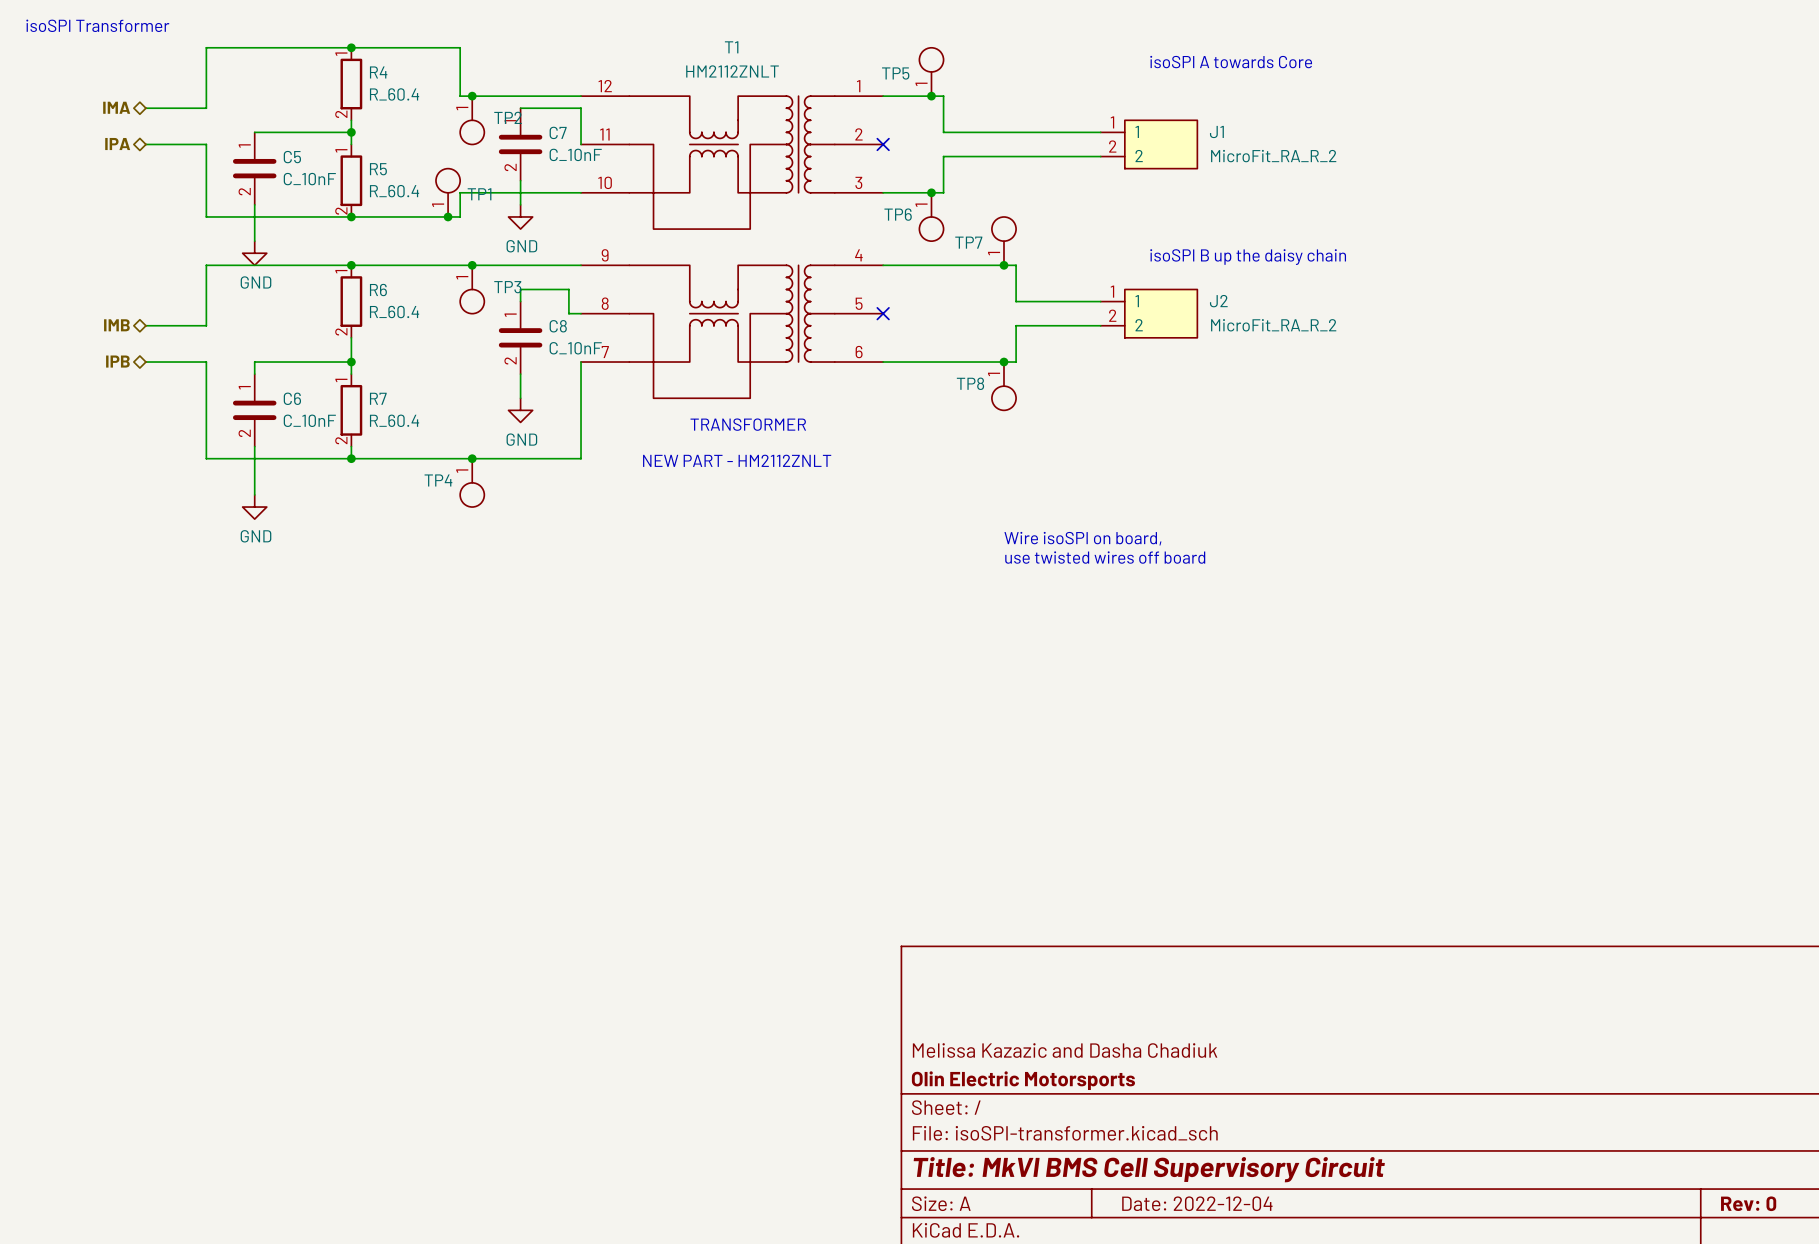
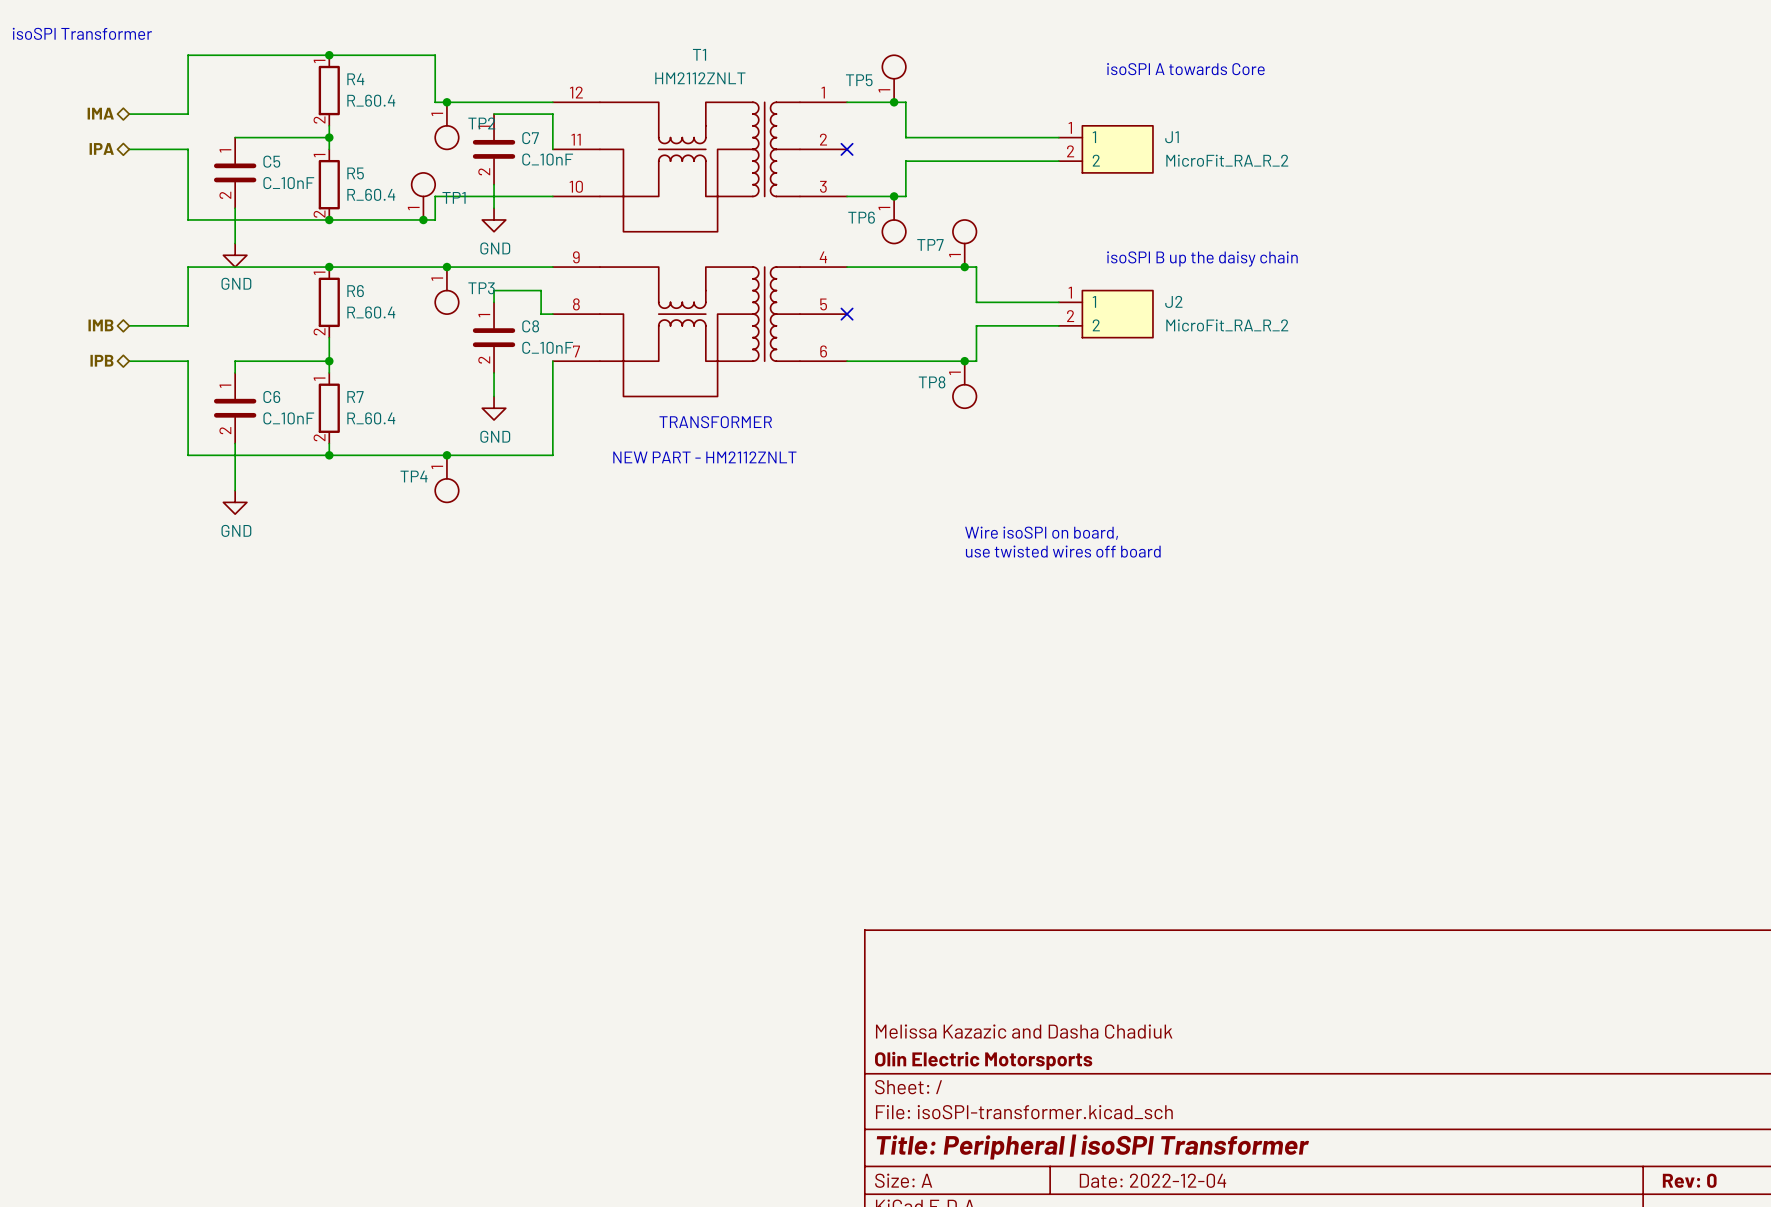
title block: Title: MkVI BMS Cell Supervisory Circuit (1149, 1169) -> Title: Peripheral | isoSPI Transformer (1092, 1147)

